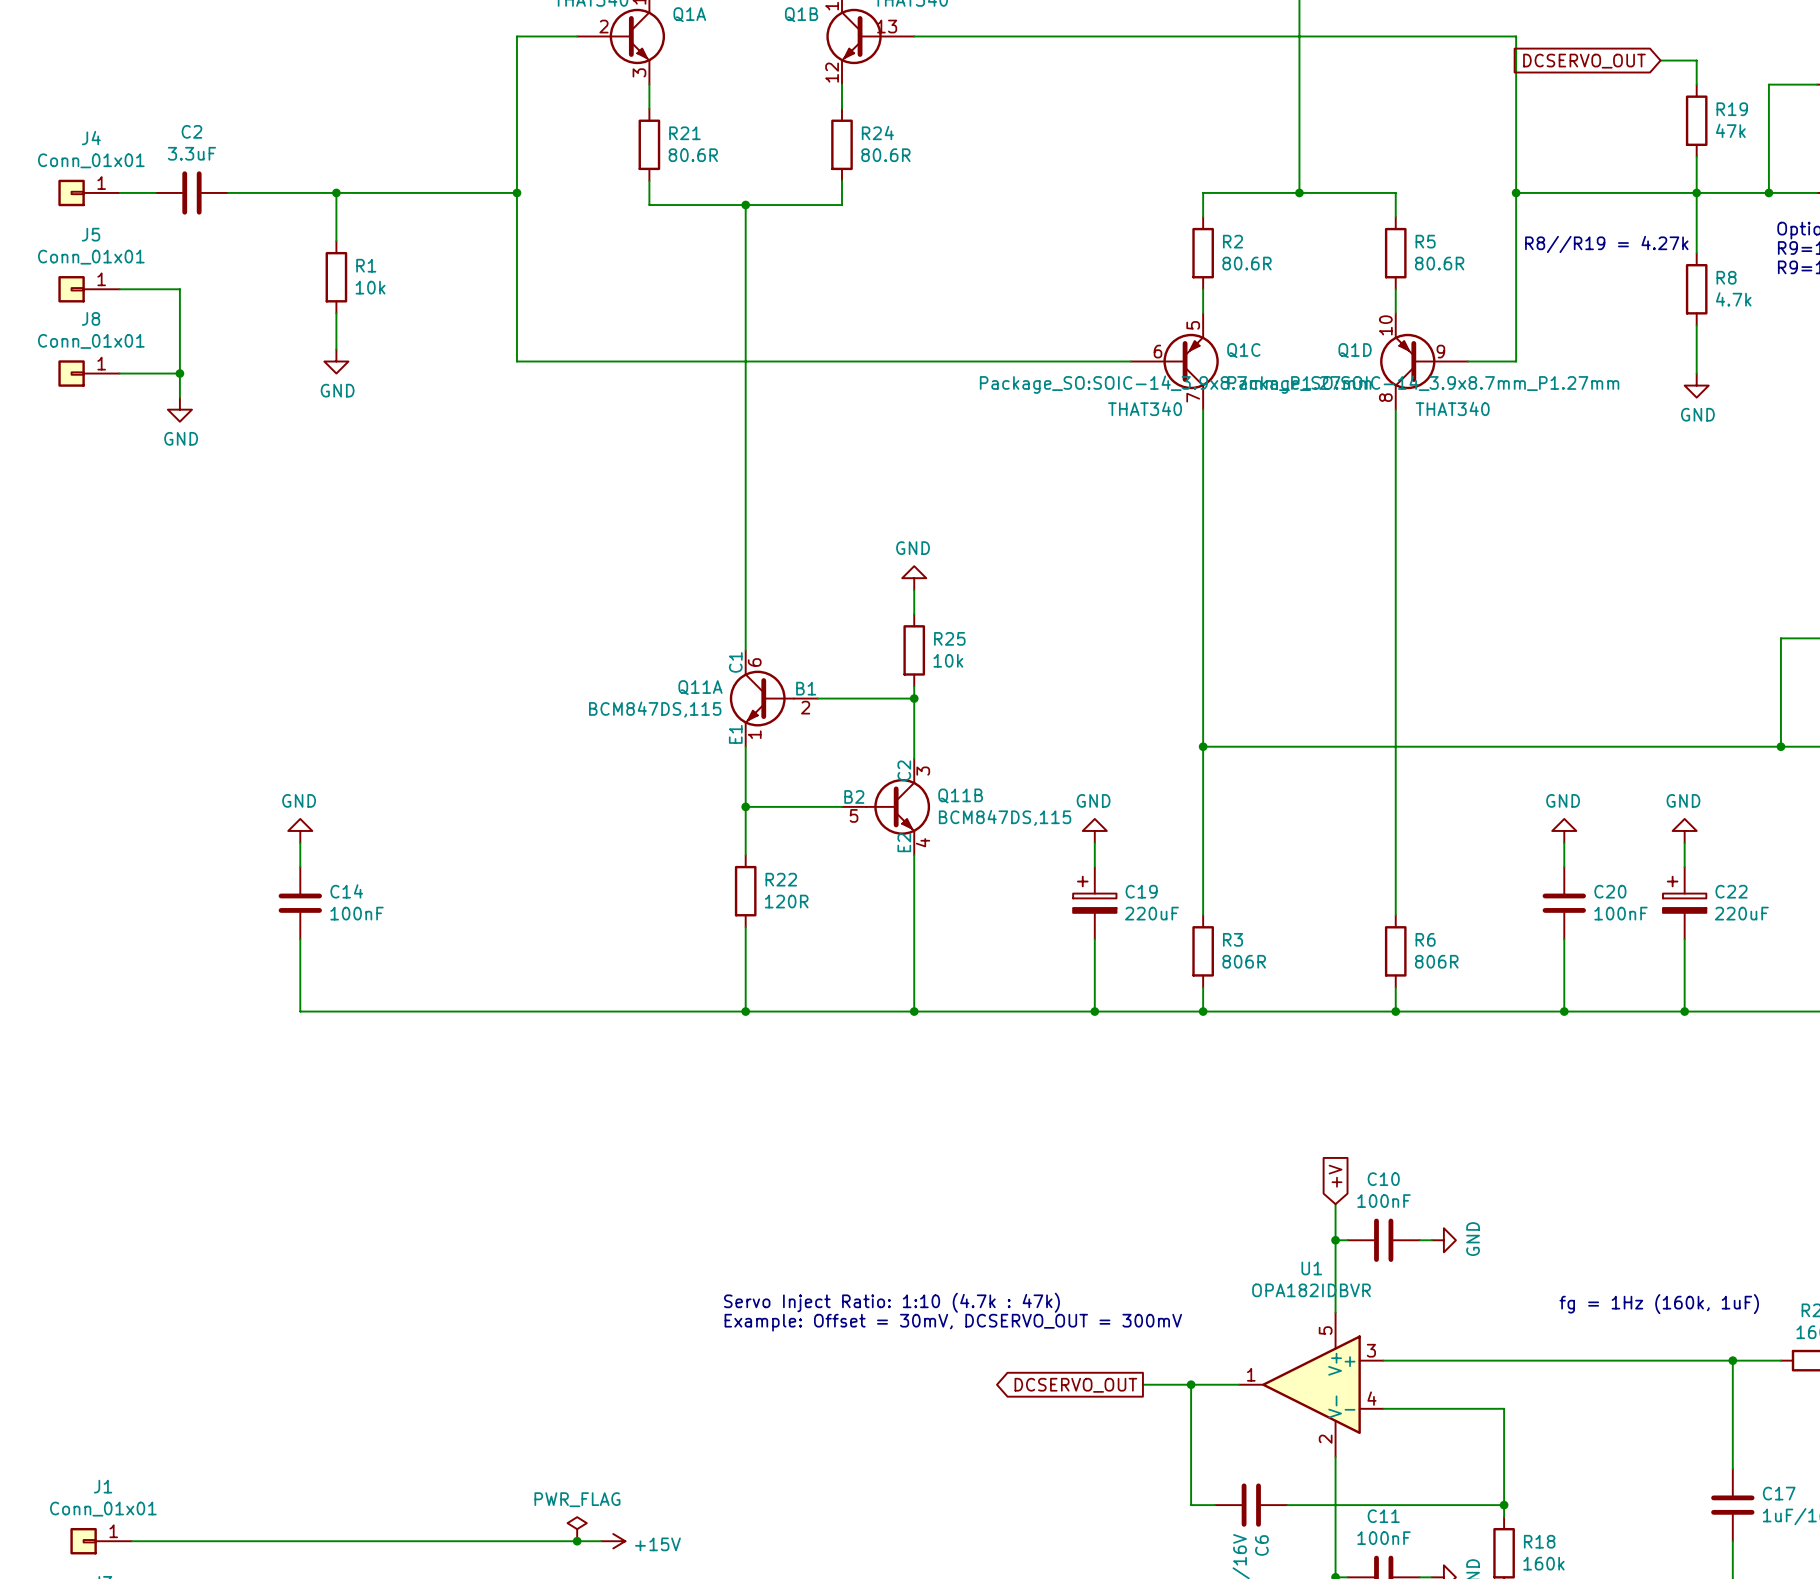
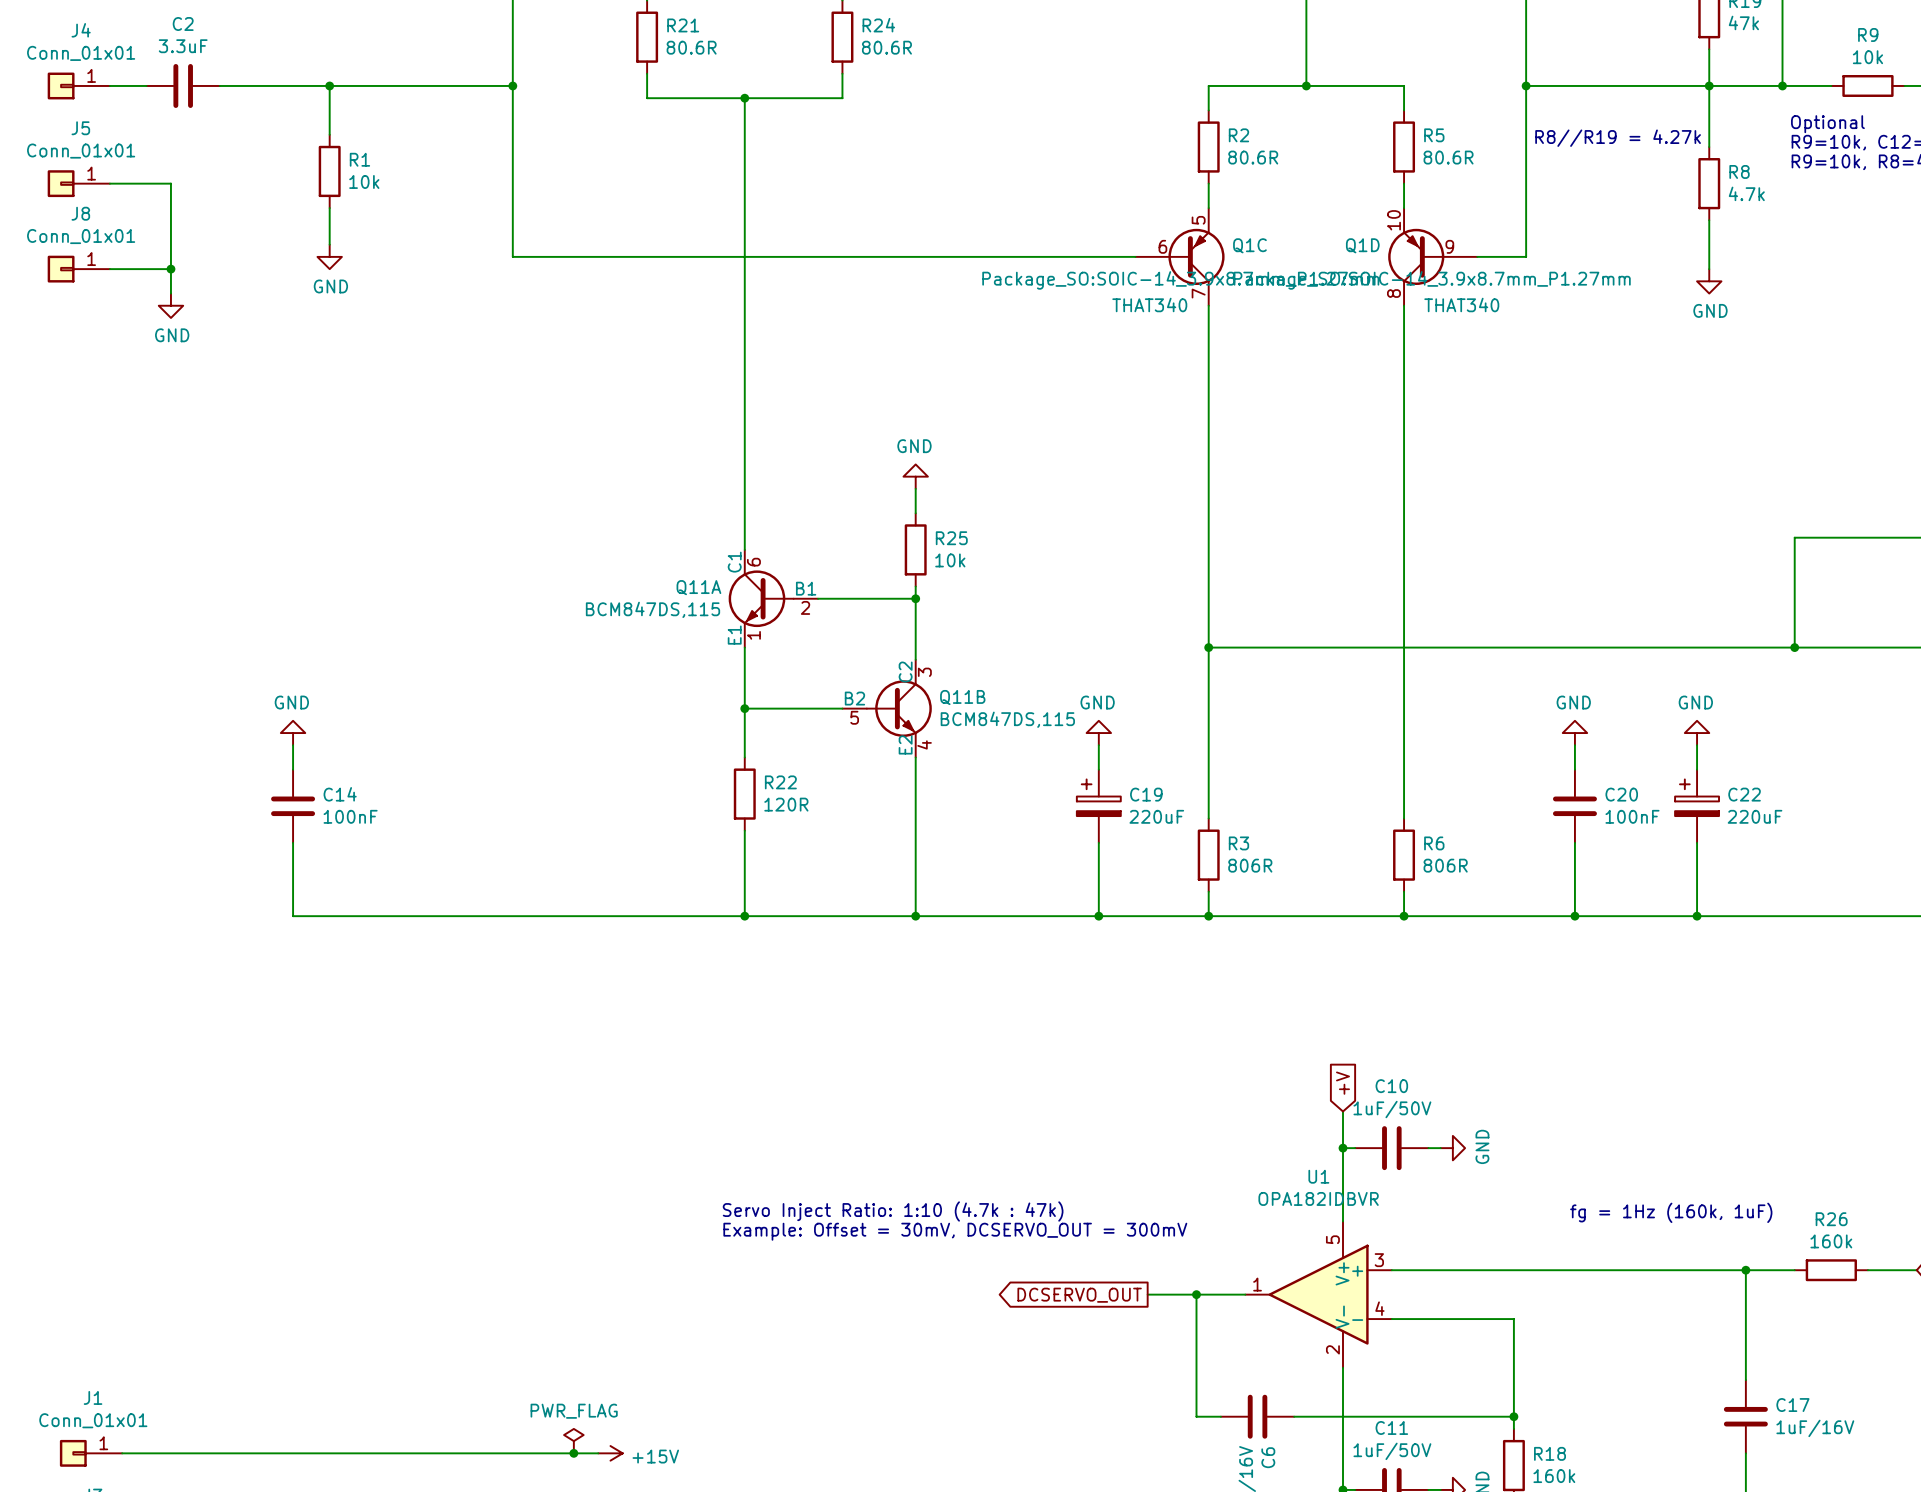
C10 value: 100nF (1384, 1201) -> 1uF/50V (1392, 1109)
C11 value: 100nF (1384, 1538) -> 1uF/50V (1392, 1451)

